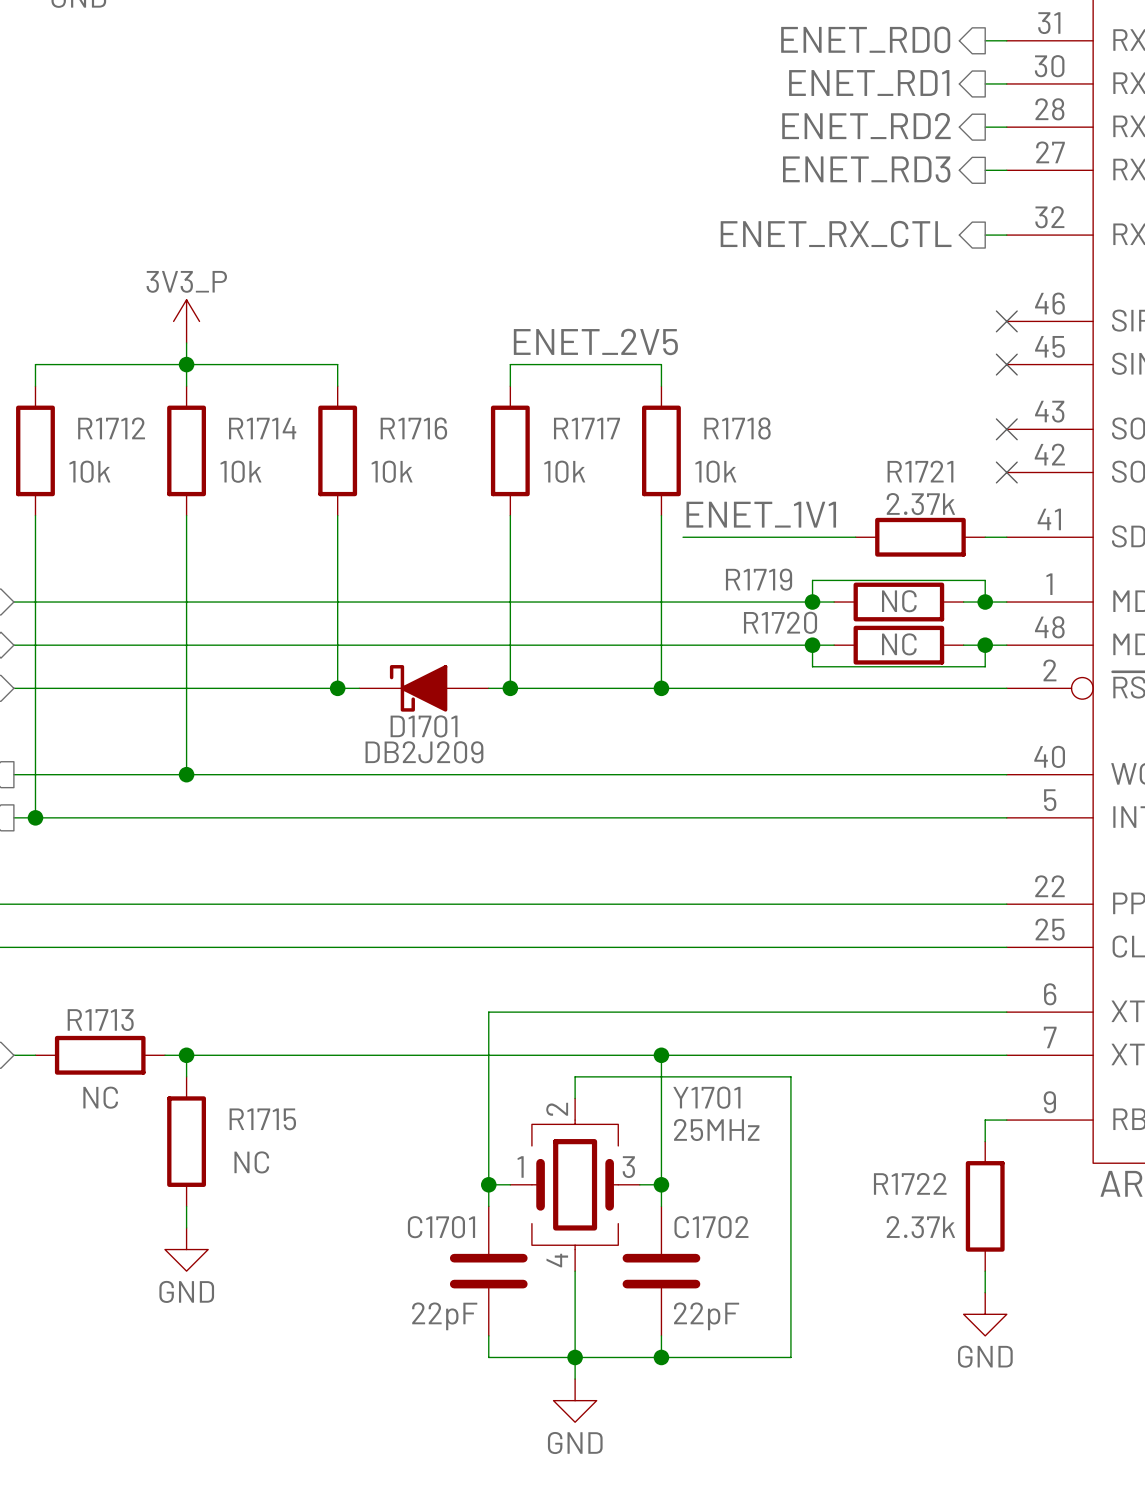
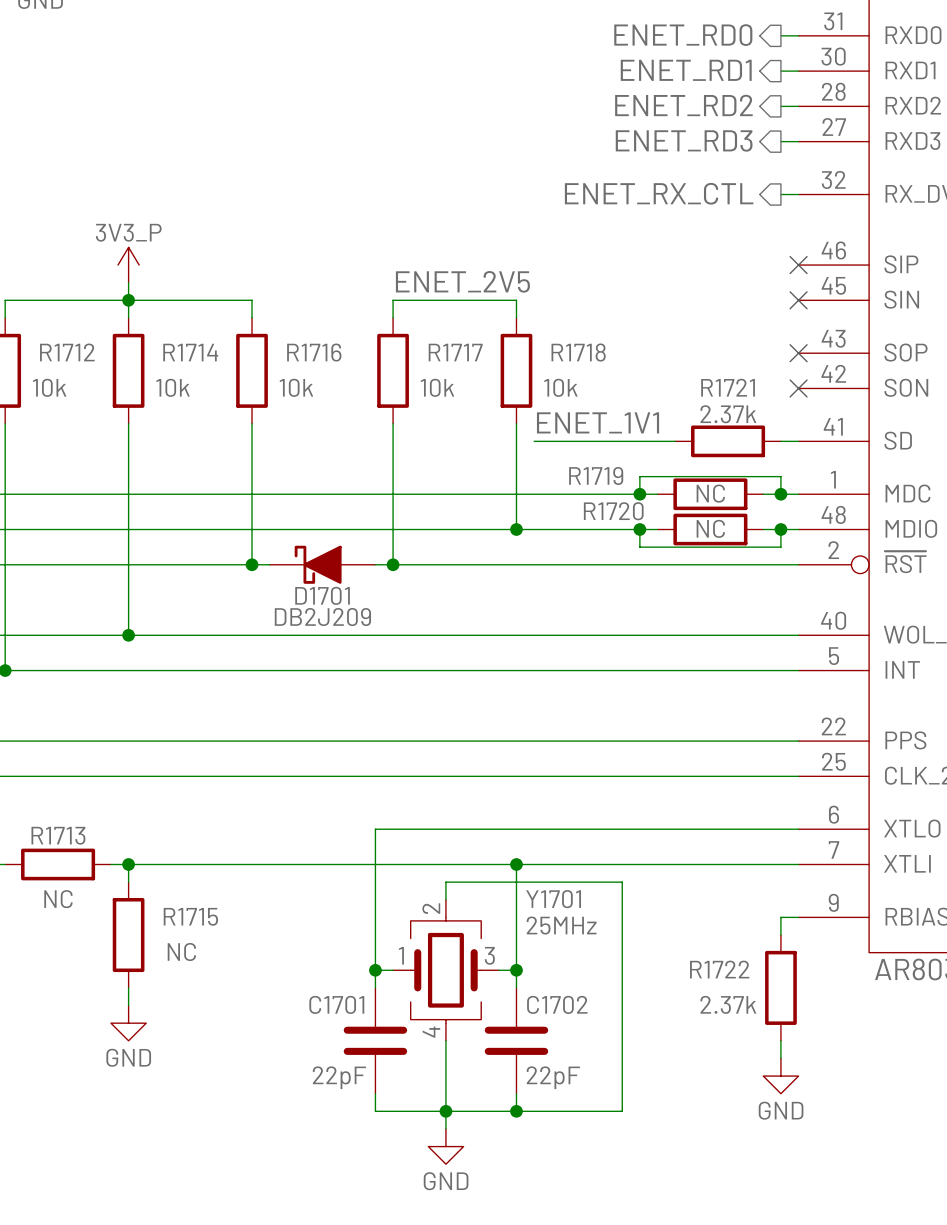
wire: (661, 645) (661, 688) -> none
junction position: (661, 688) -> (516, 529)

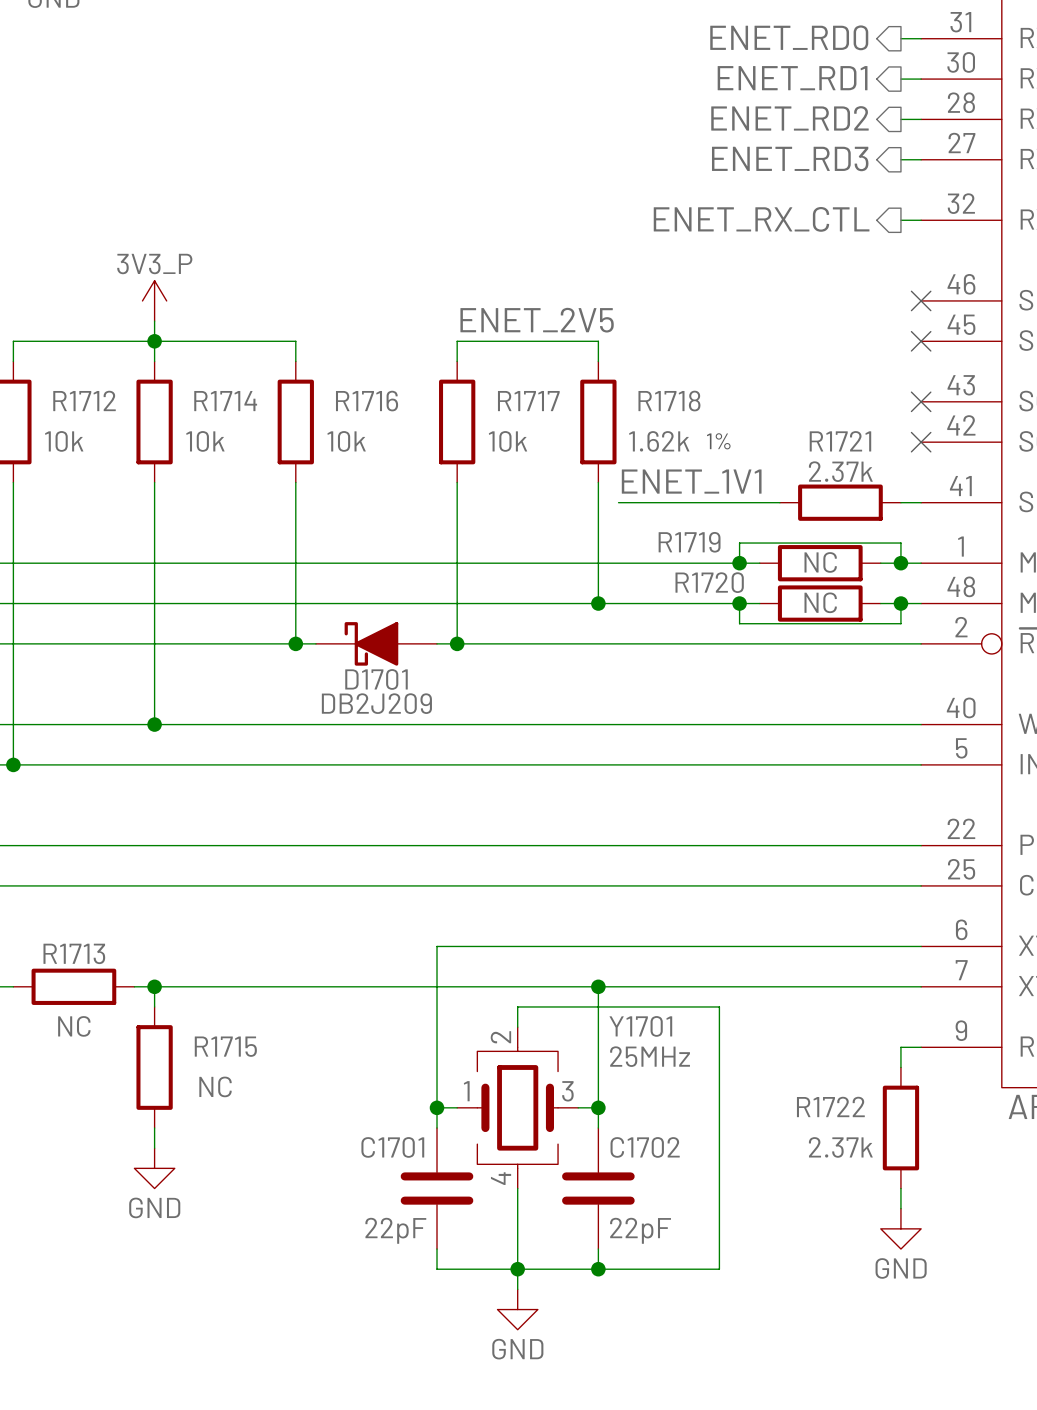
R1718 value: 10k (560, 387) -> 1.62k (659, 441)
text: none -> 1% (718, 441)

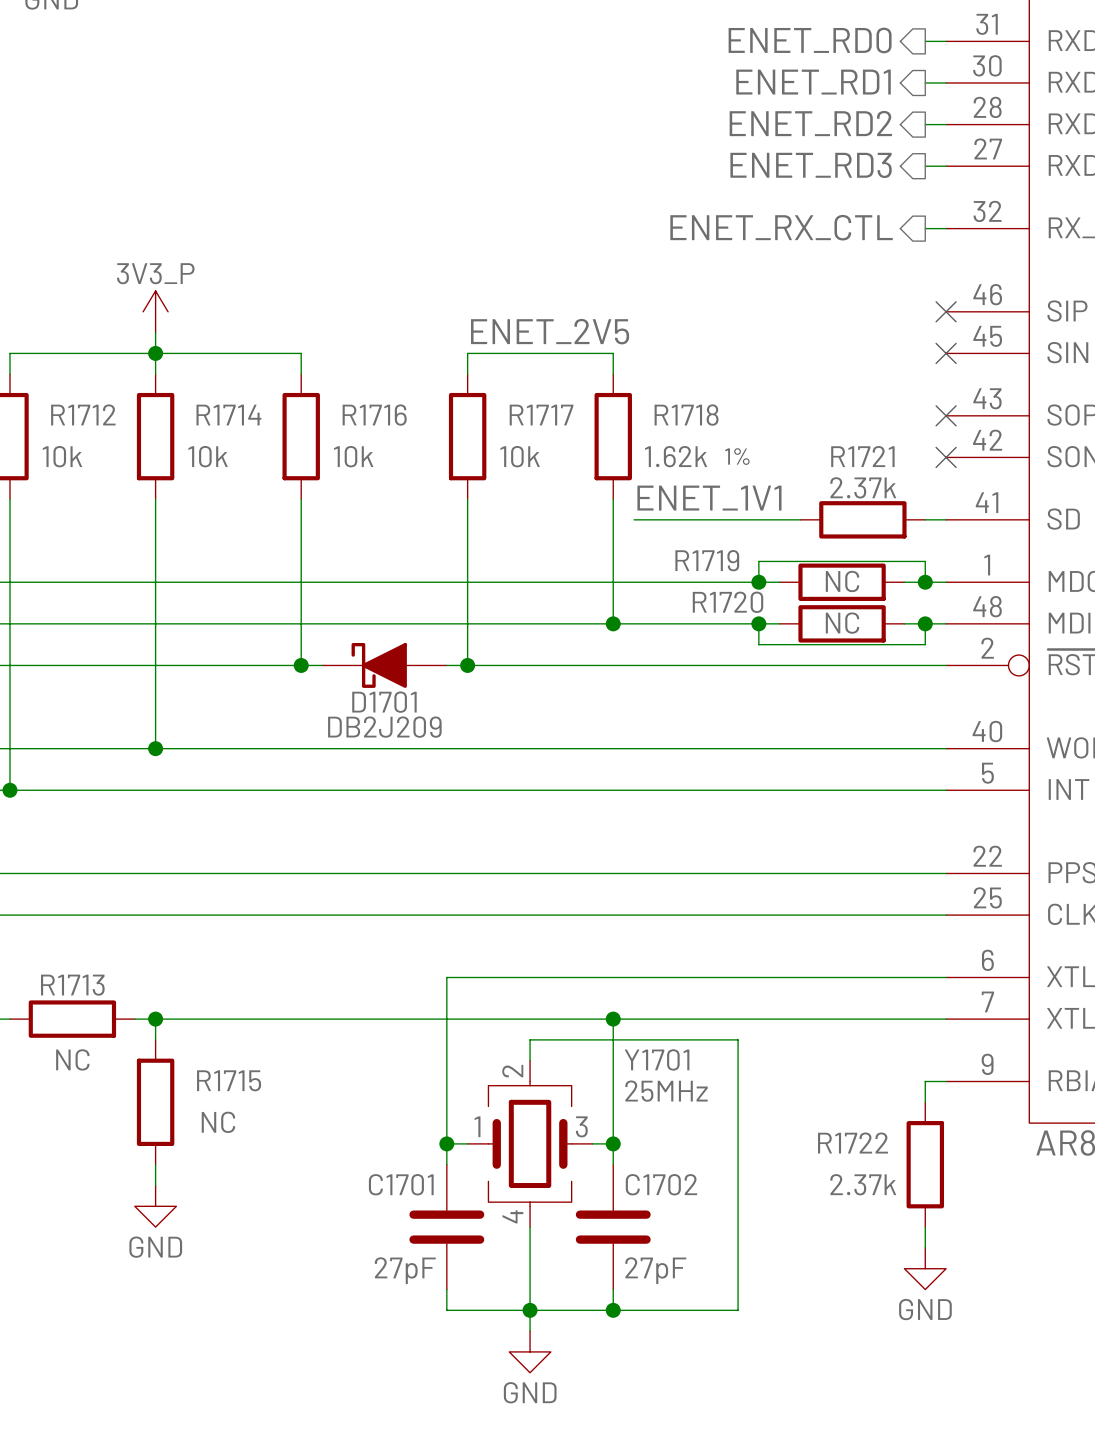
C1701 value: 22pF (395, 1230) -> 27pF (405, 1270)
C1702 value: 22pF (640, 1230) -> 27pF (655, 1270)

